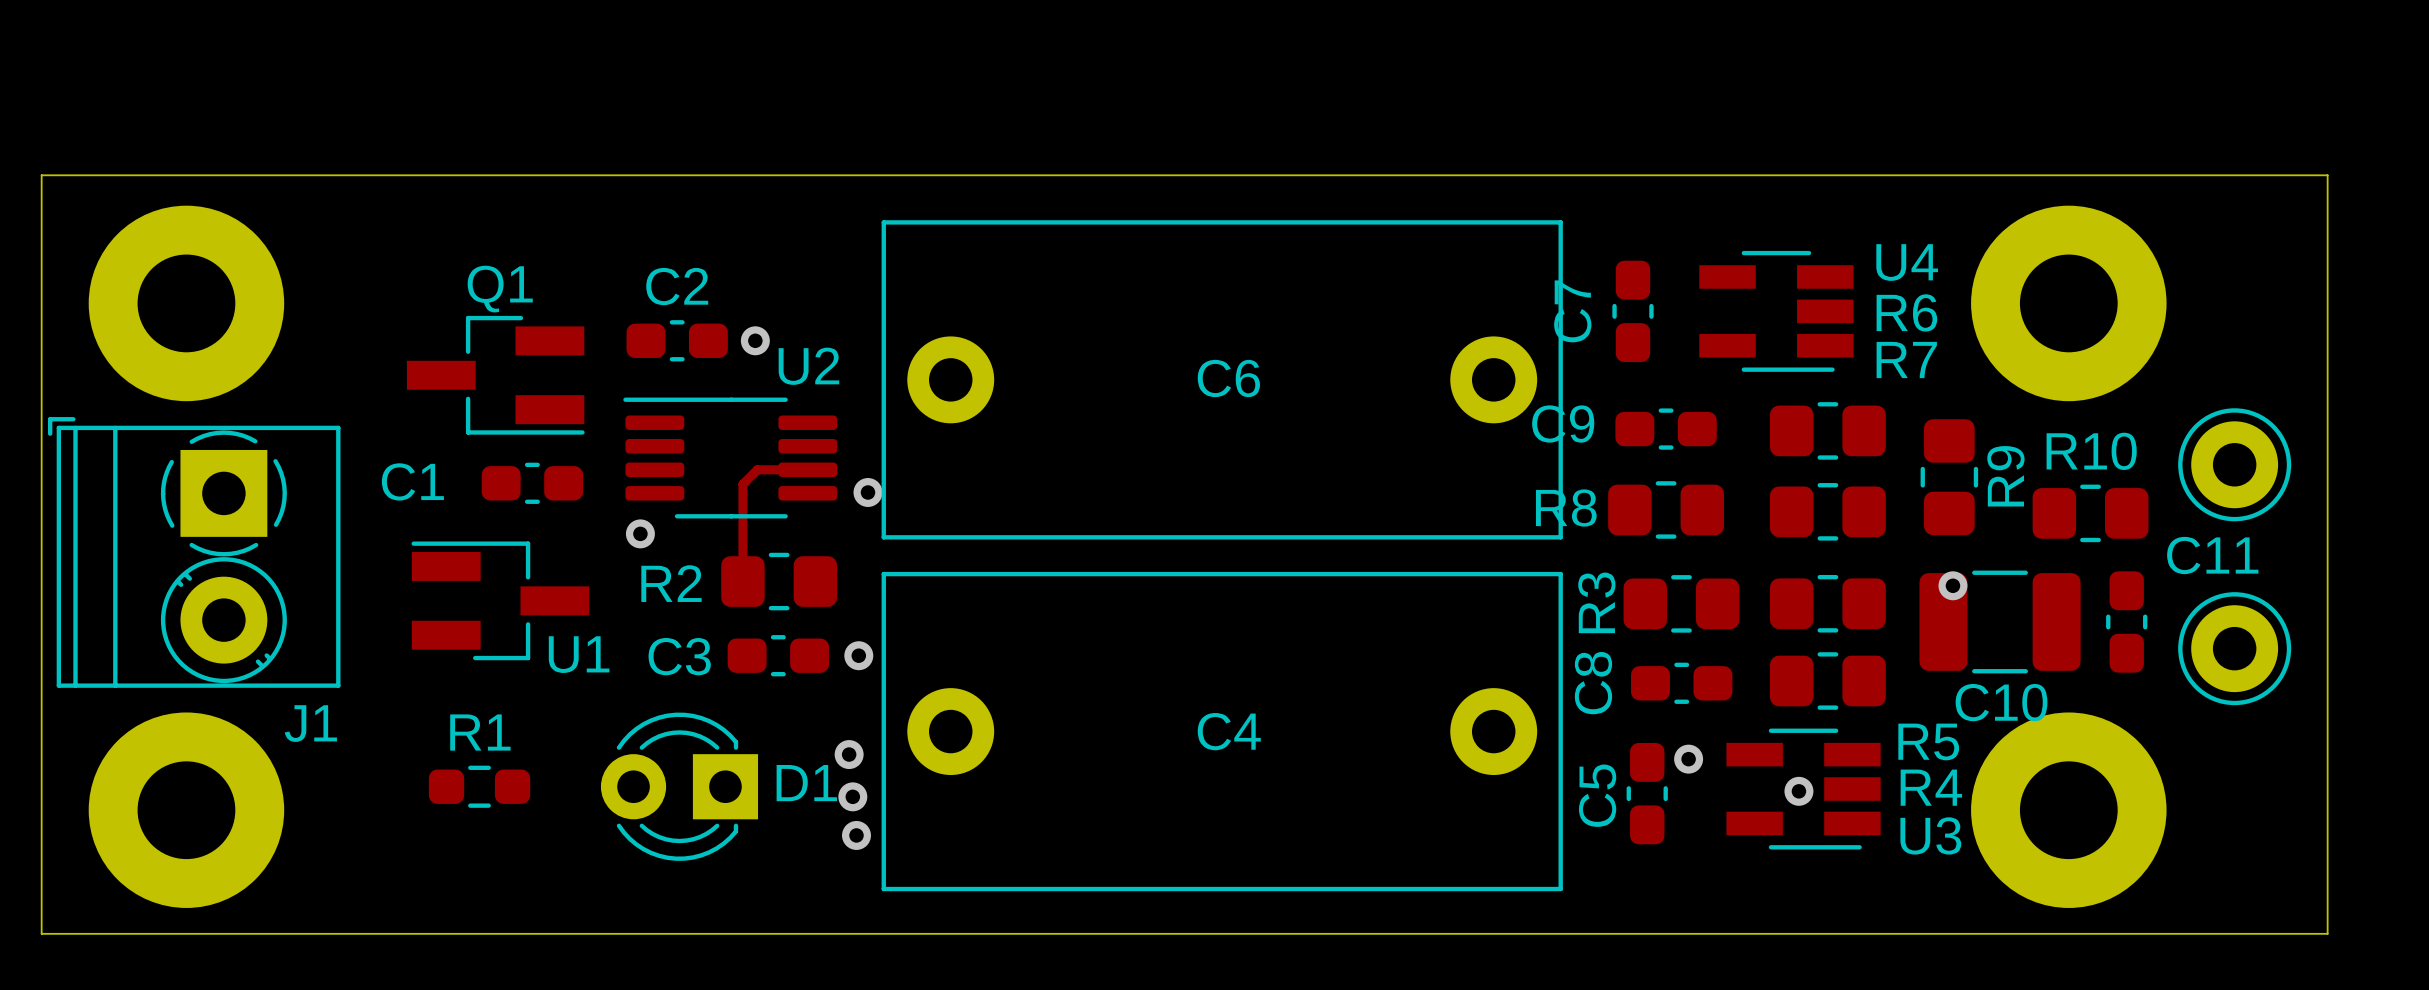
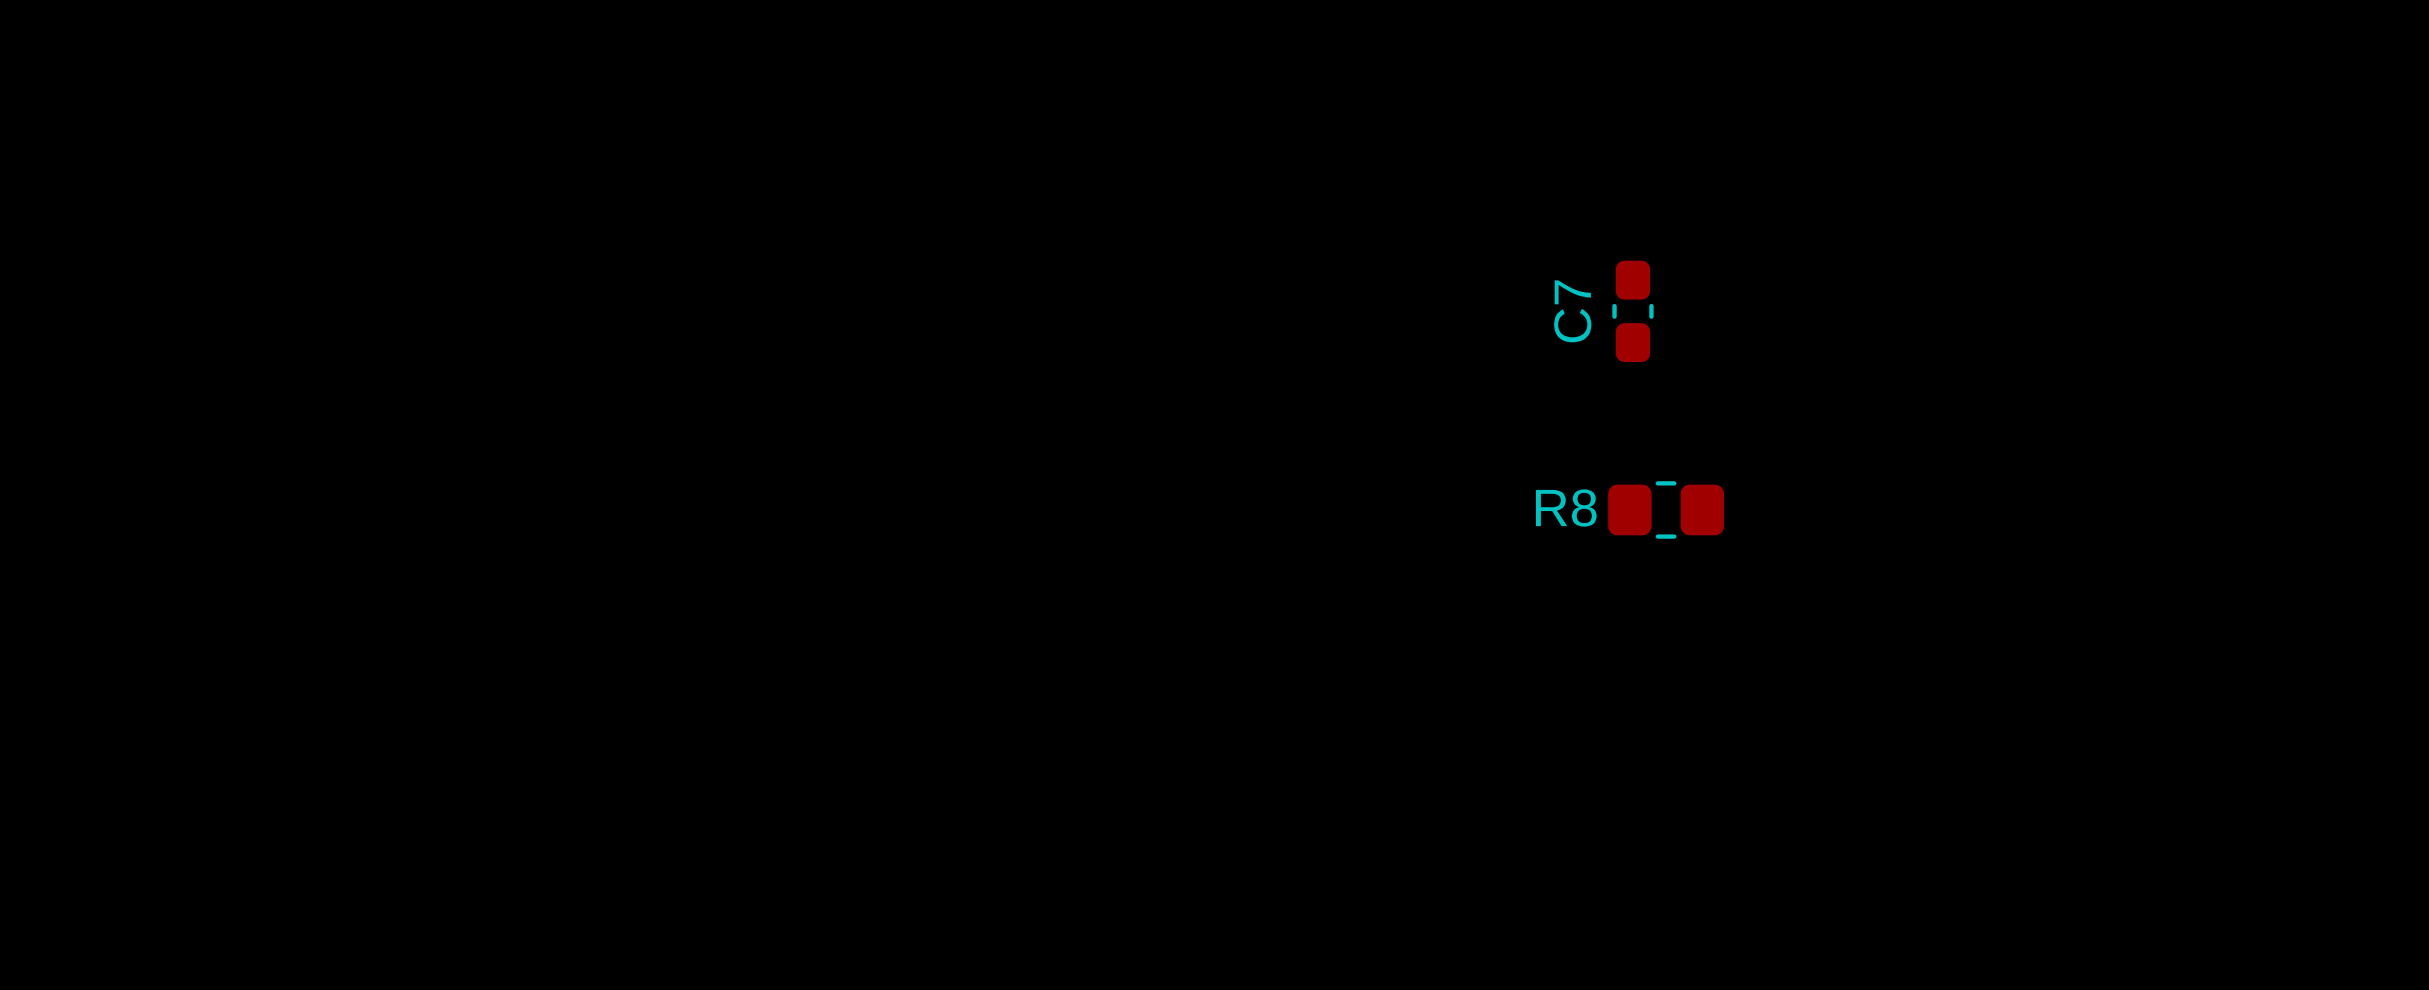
board edge: (41, 175) (41, 933) (2327, 933) (2327, 175) (41, 175) -> none
part: (186, 303) -> none
part: (2068, 303) -> none
U4: (1776, 311) -> none
C2: (677, 340) -> none
via: (755, 340) -> none
Q1: (495, 375) -> none
C6: (1222, 379) -> none
C9: (1666, 429) -> none
R6: (1827, 430) -> none
U2: (730, 458) -> none
part: (2234, 464) -> none
top track: (807, 469) (757, 469) (742, 484) (742, 581) -> none
R9: (1949, 477) -> none
C1: (532, 483) -> none
via: (867, 492) -> none
R7: (1827, 511) -> none
R10: (2090, 513) -> none
via: (640, 533) -> none
J1: (194, 552) -> none
R2: (779, 581) -> none
via: (1952, 585) -> none
U1: (500, 600) -> none
R3: (1681, 603) -> none
R5: (1827, 603) -> none
C10: (2000, 621) -> none
C11: (2126, 621) -> none
part: (2234, 648) -> none
C3: (778, 655) -> none
via: (858, 655) -> none
R4: (1827, 680) -> none
C8: (1681, 683) -> none
C4: (1222, 731) -> none
via: (849, 754) -> none
via: (1688, 759) -> none
R1: (479, 786) -> none
D1: (679, 786) -> none
U3: (1803, 789) -> none
via: (1798, 791) -> none
C5: (1647, 793) -> none
via: (852, 796) -> none
part: (186, 810) -> none
part: (2068, 810) -> none
via: (856, 835) -> none

